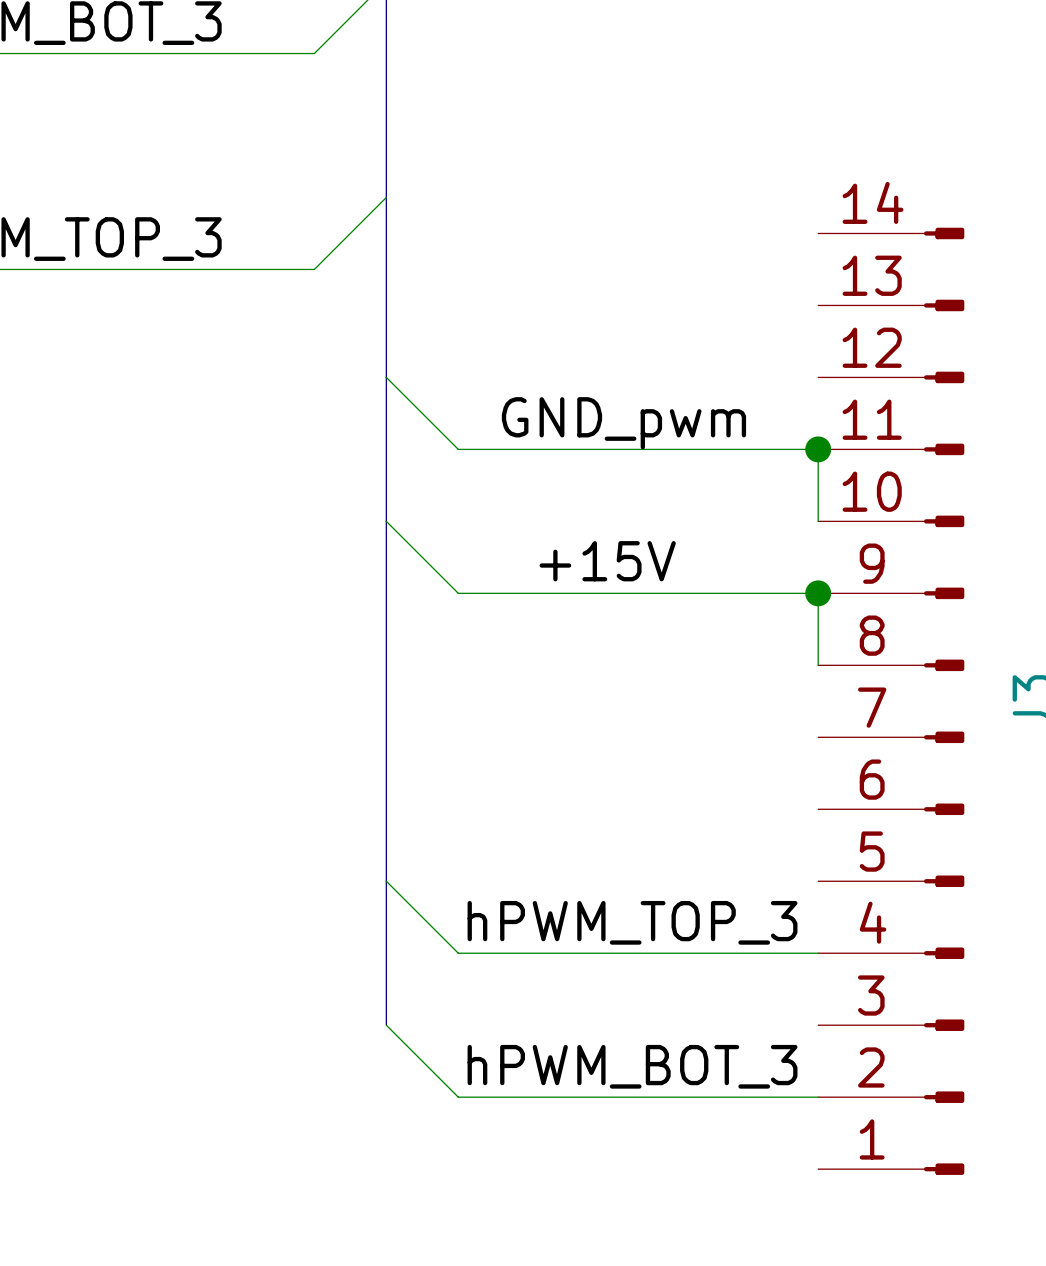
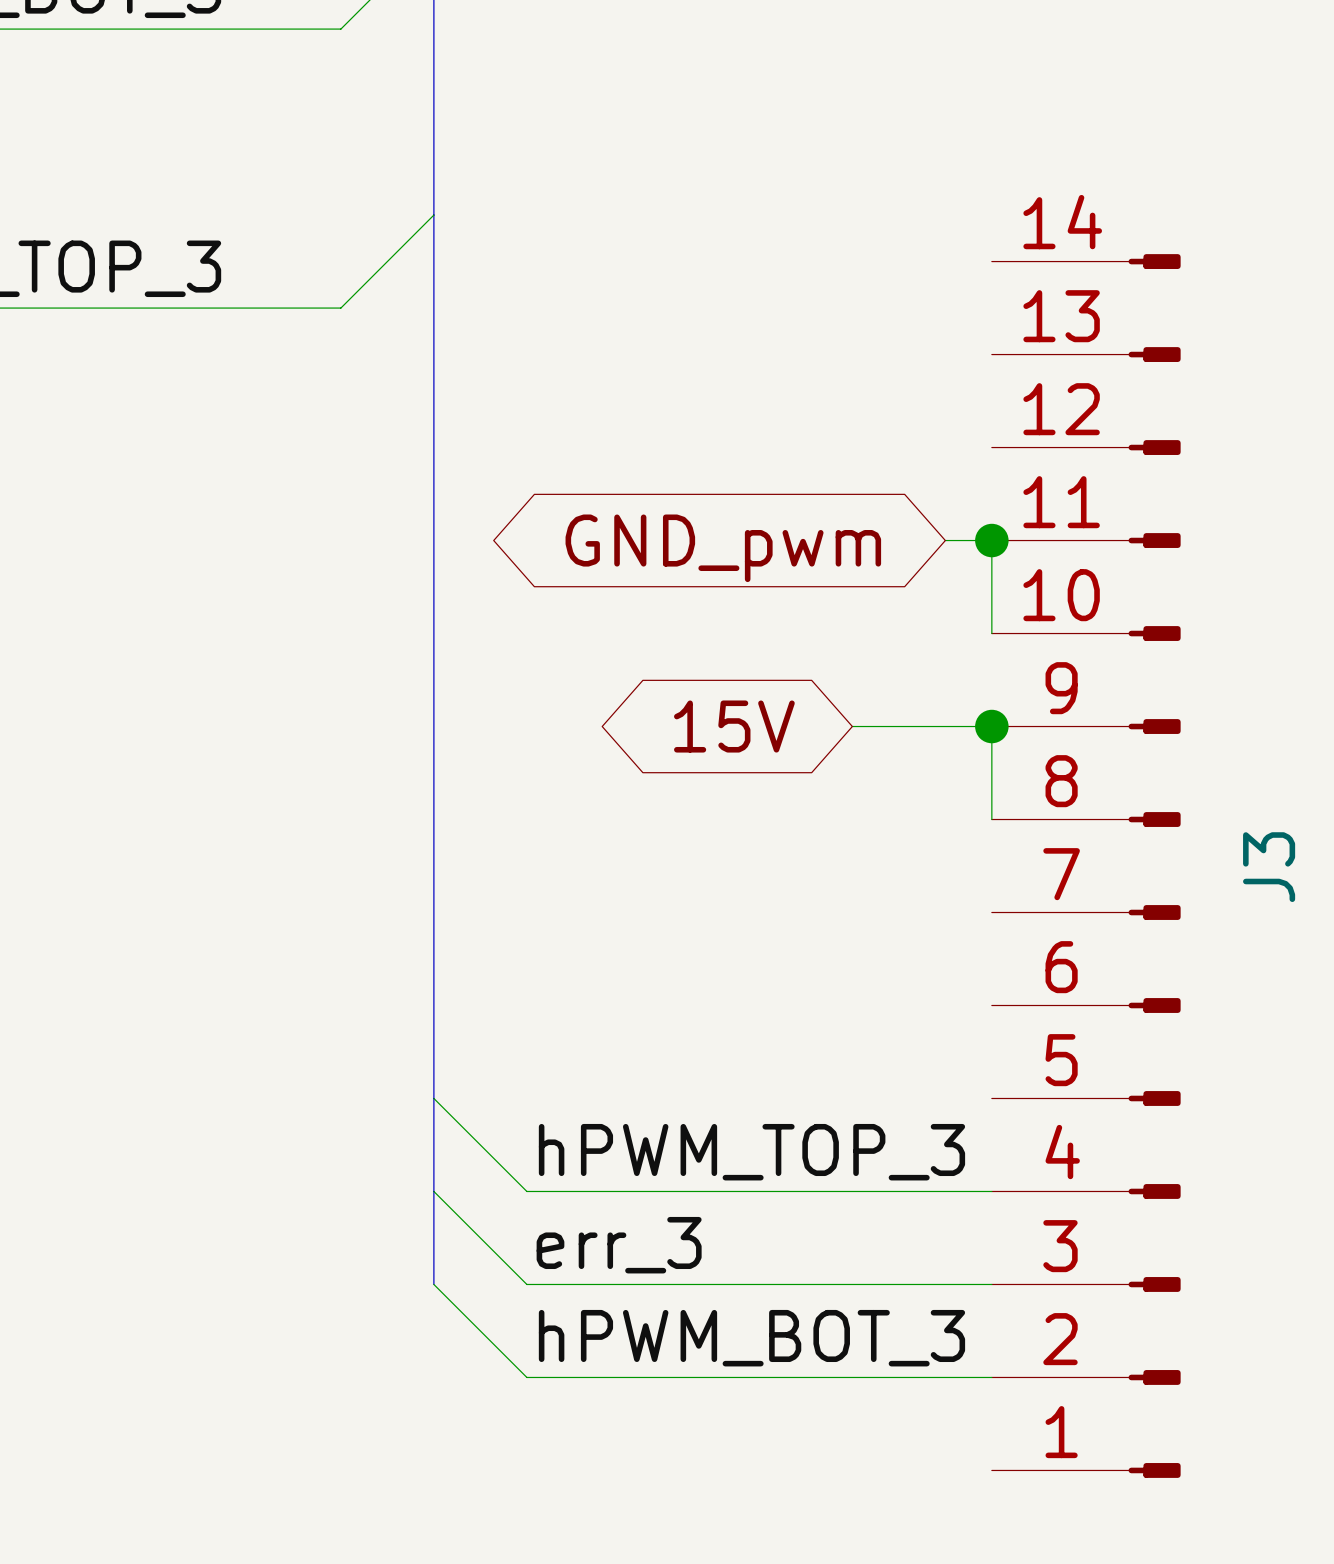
wire: (386, 377) (458, 449) (782, 449) -> none
label: GND_pwm (623, 423) -> none
global label: none -> GND_pwm (723, 548)
wire: (386, 521) (458, 593) (710, 593) -> none
label: +15V (607, 561) -> none
global label: none -> 15V (734, 726)
wire: none -> (433, 1191) (526, 1284) (991, 1284)
label: none -> err_3 (619, 1245)

